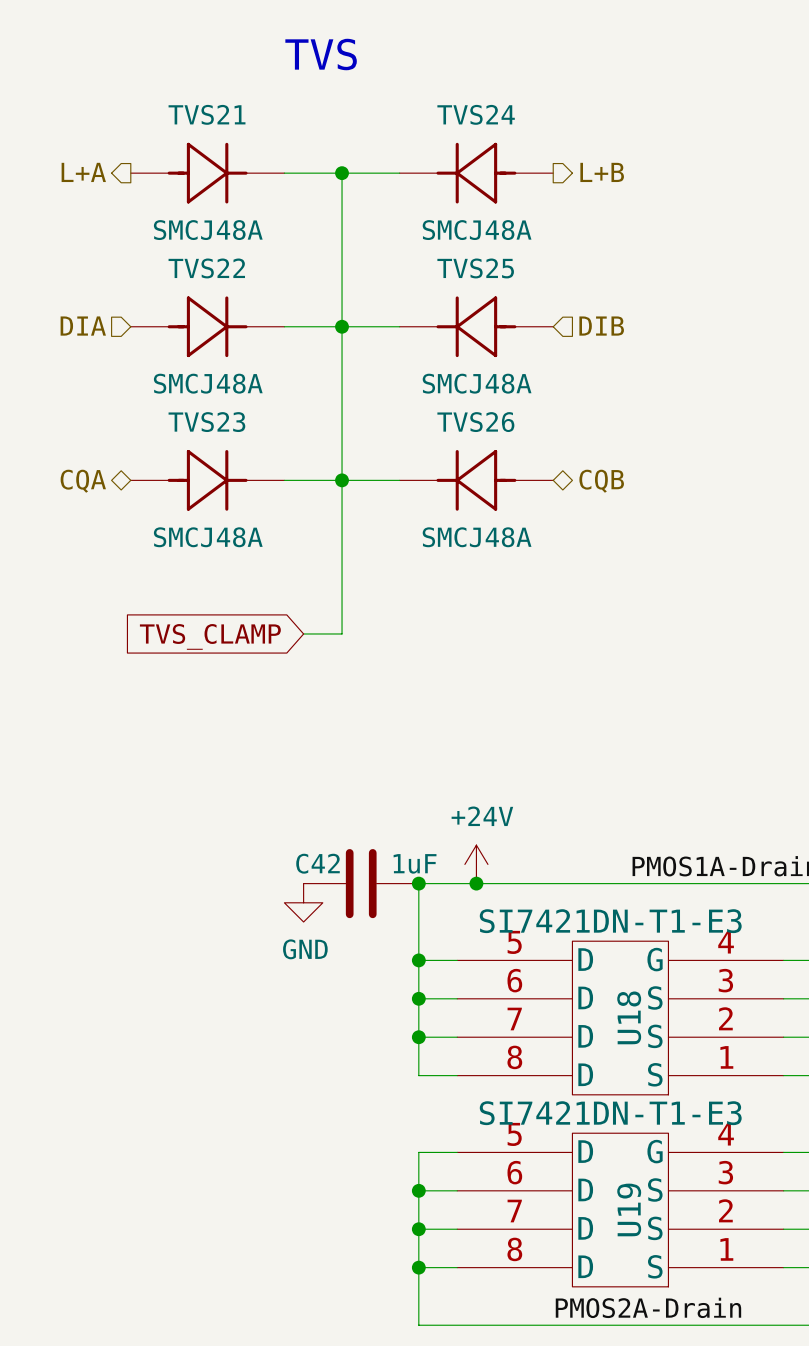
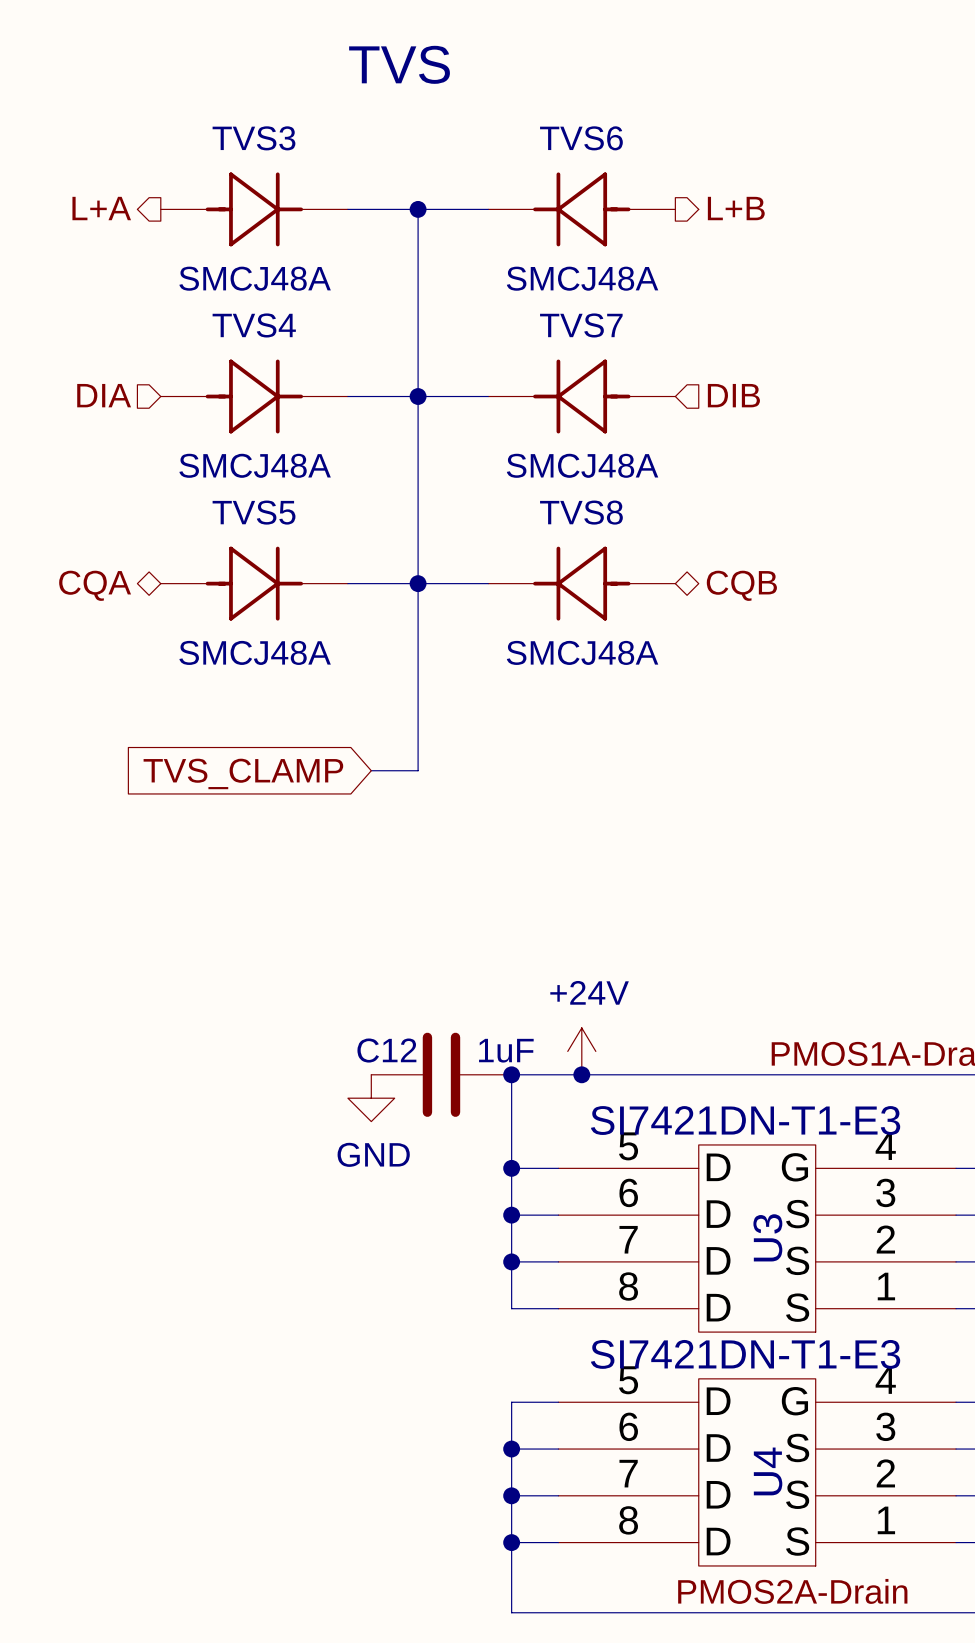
TVS21 name: TVS21 (207, 114) -> TVS3 (253, 138)
TVS24 name: TVS24 (476, 114) -> TVS6 (581, 138)
TVS22 name: TVS22 (206, 268) -> TVS4 (254, 325)
TVS25 name: TVS25 (475, 268) -> TVS7 (581, 325)
TVS23 name: TVS23 (206, 422) -> TVS5 (254, 512)
TVS26 name: TVS26 (475, 422) -> TVS8 (581, 512)
C42 name: C42 (318, 863) -> C12 (386, 1050)
U18 name: U18 (629, 1017) -> U3 (767, 1237)
U19 name: U19 (629, 1209) -> U4 (768, 1471)

